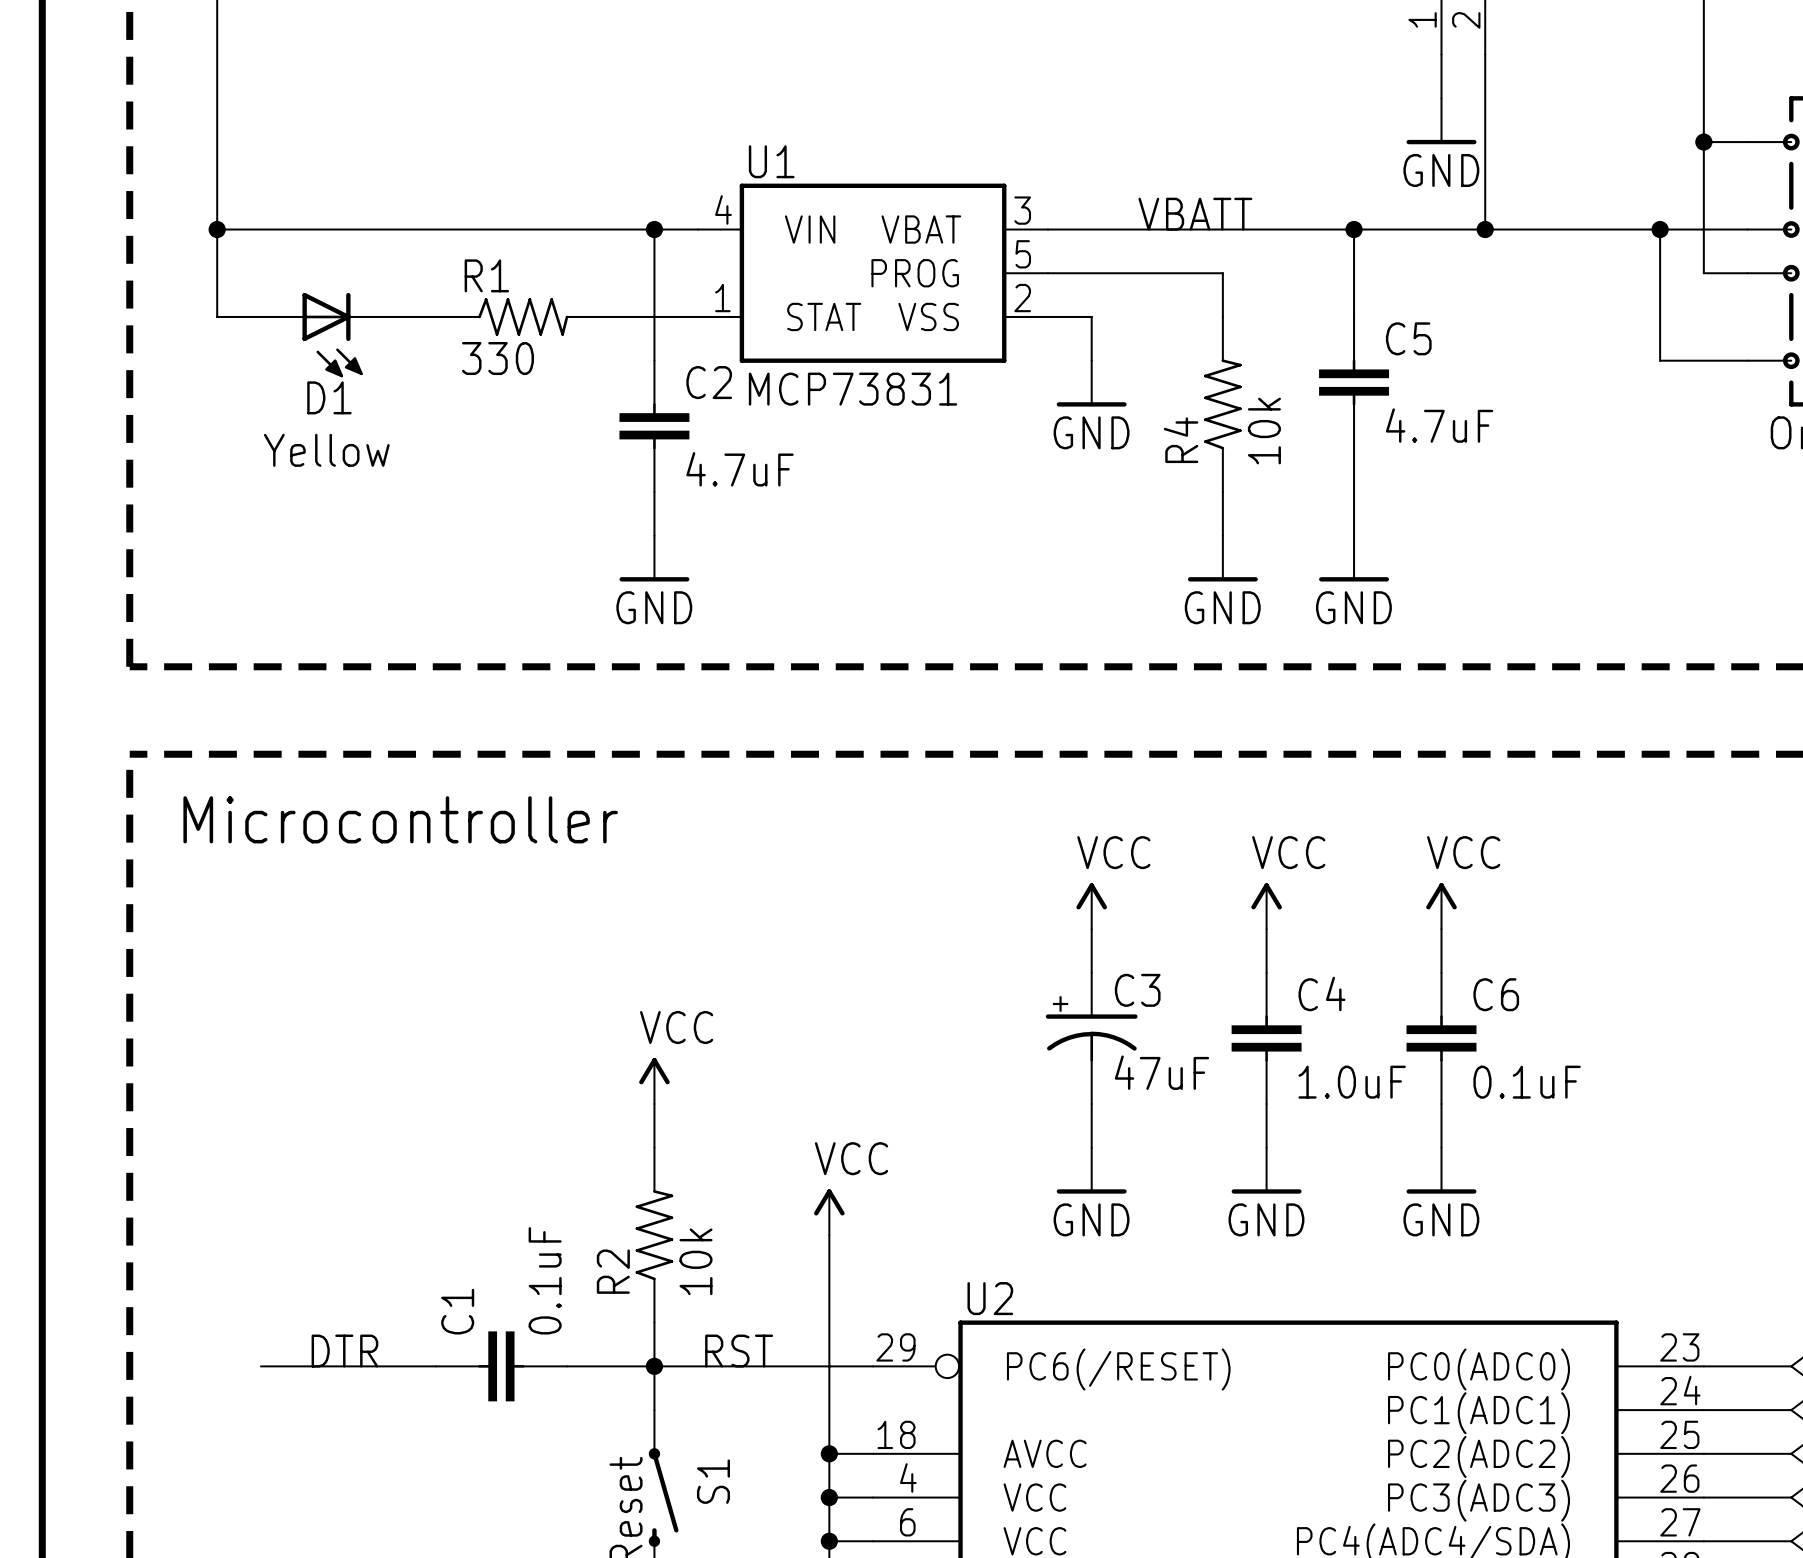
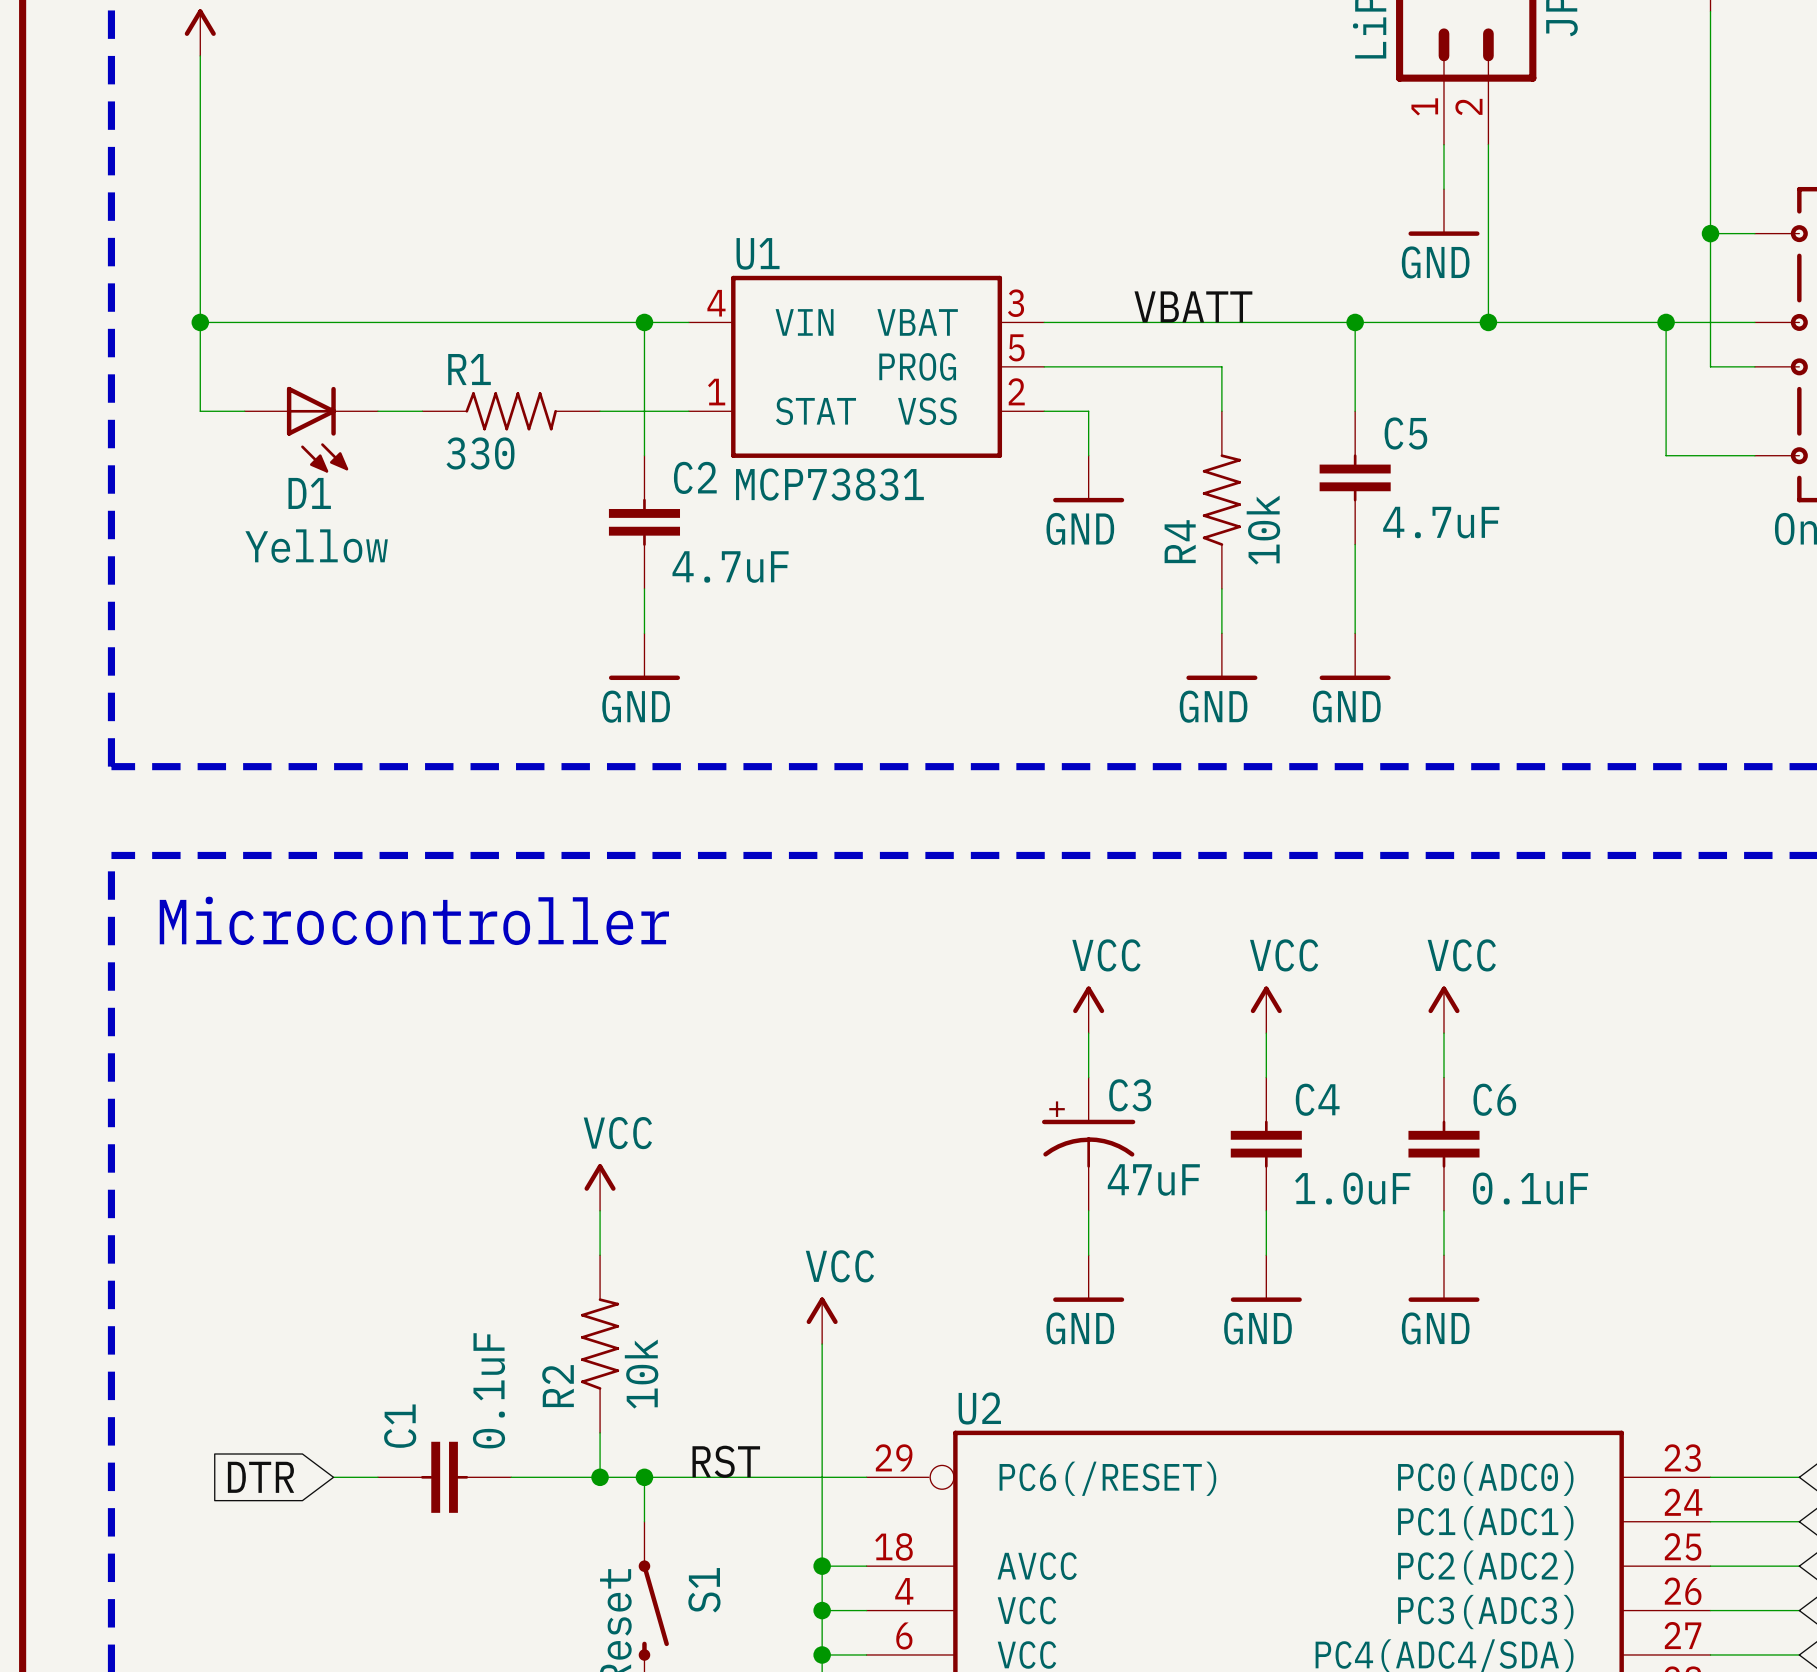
power symbol position: VCC (654, 1081) -> VCC (600, 1187)
wire: (654, 1104) (654, 1147) -> (600, 1210) (600, 1255)
R2 position: (654, 1235) -> (600, 1344)
wire: (654, 1322) (654, 1366) -> (600, 1432) (600, 1477)
label: DTR (344, 1351) -> none
wire: (260, 1366) (348, 1366) -> none
global label: none -> DTR (261, 1477)
C1 position: (501, 1366) -> (444, 1477)
junction: none -> (600, 1477)

